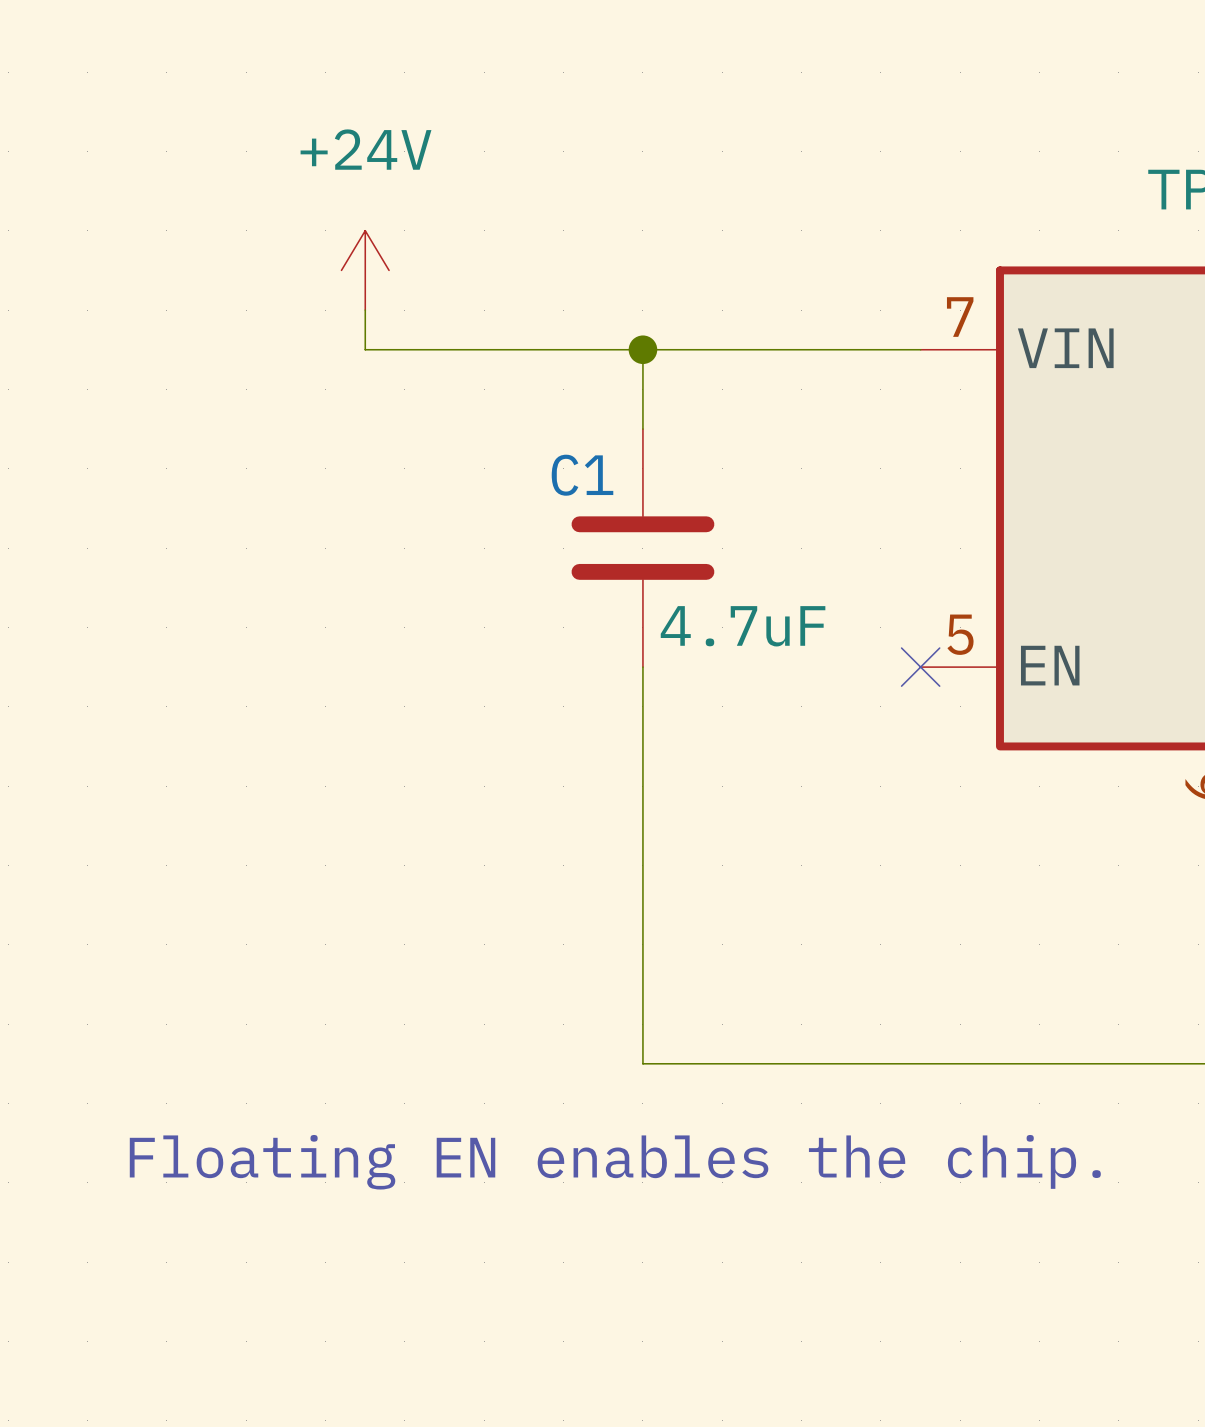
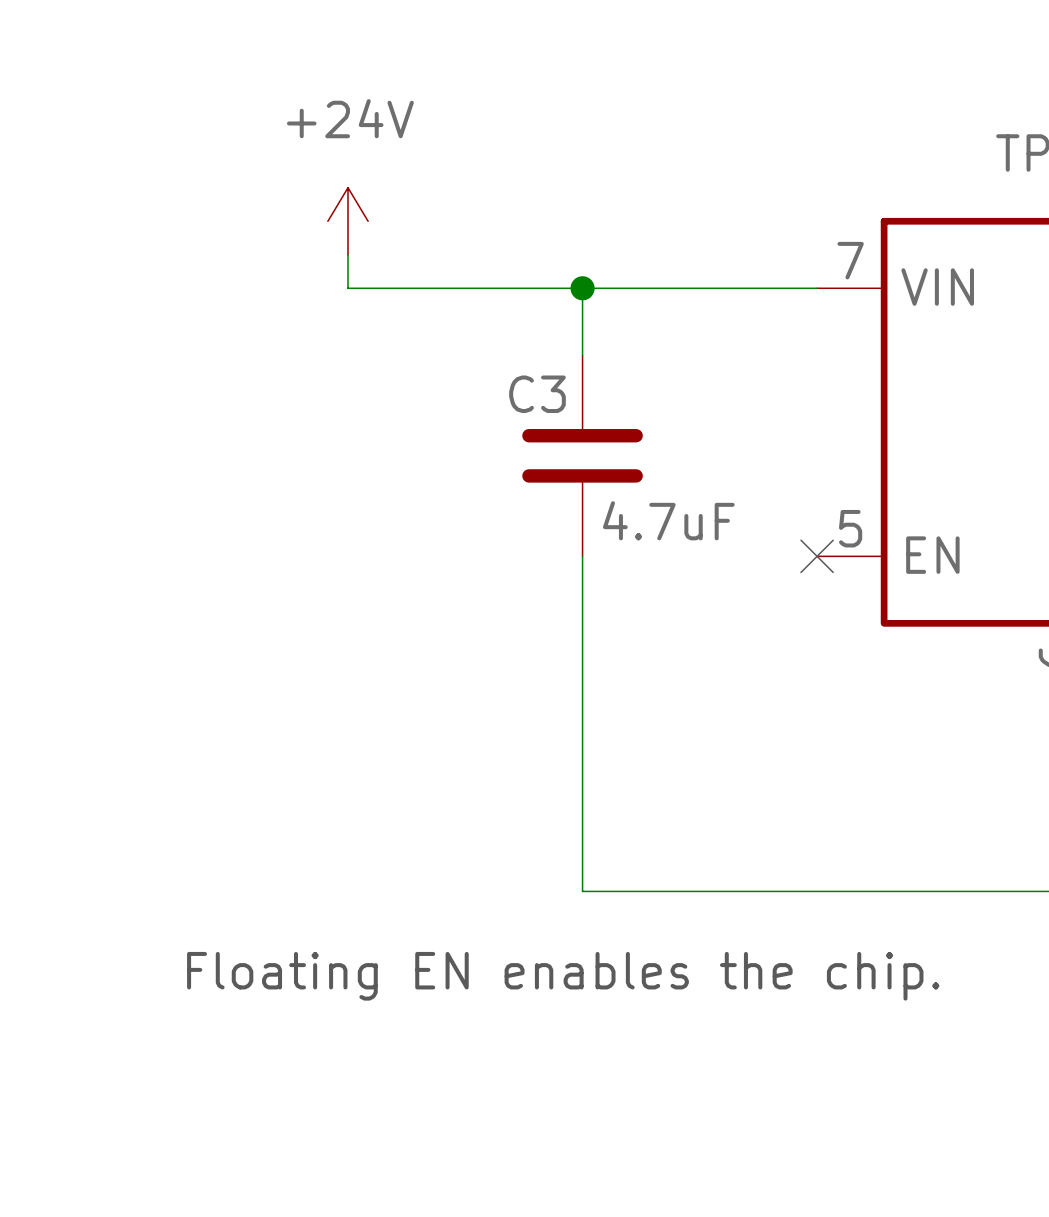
C1 name: C1 (582, 475) -> C3 (537, 394)

